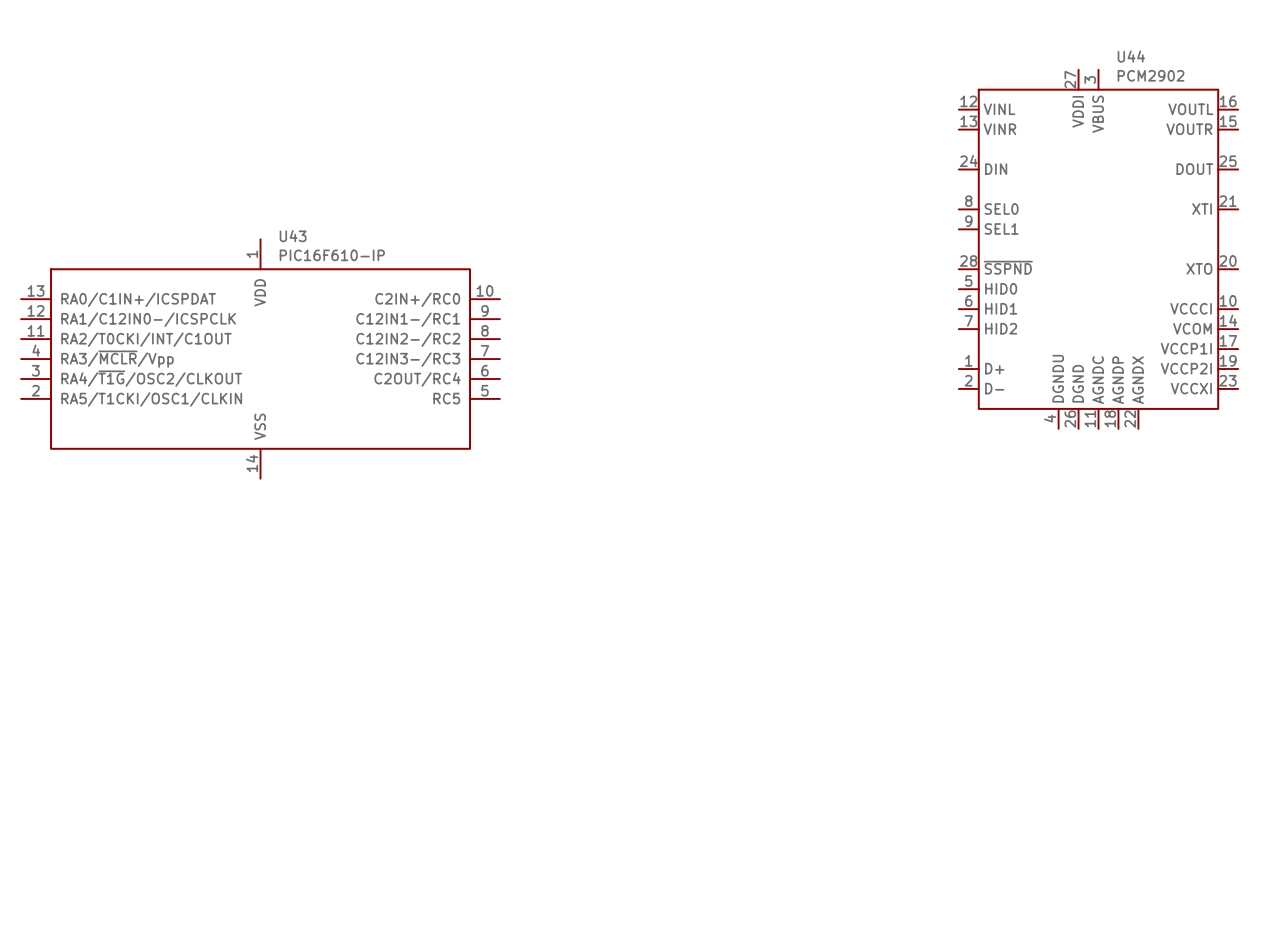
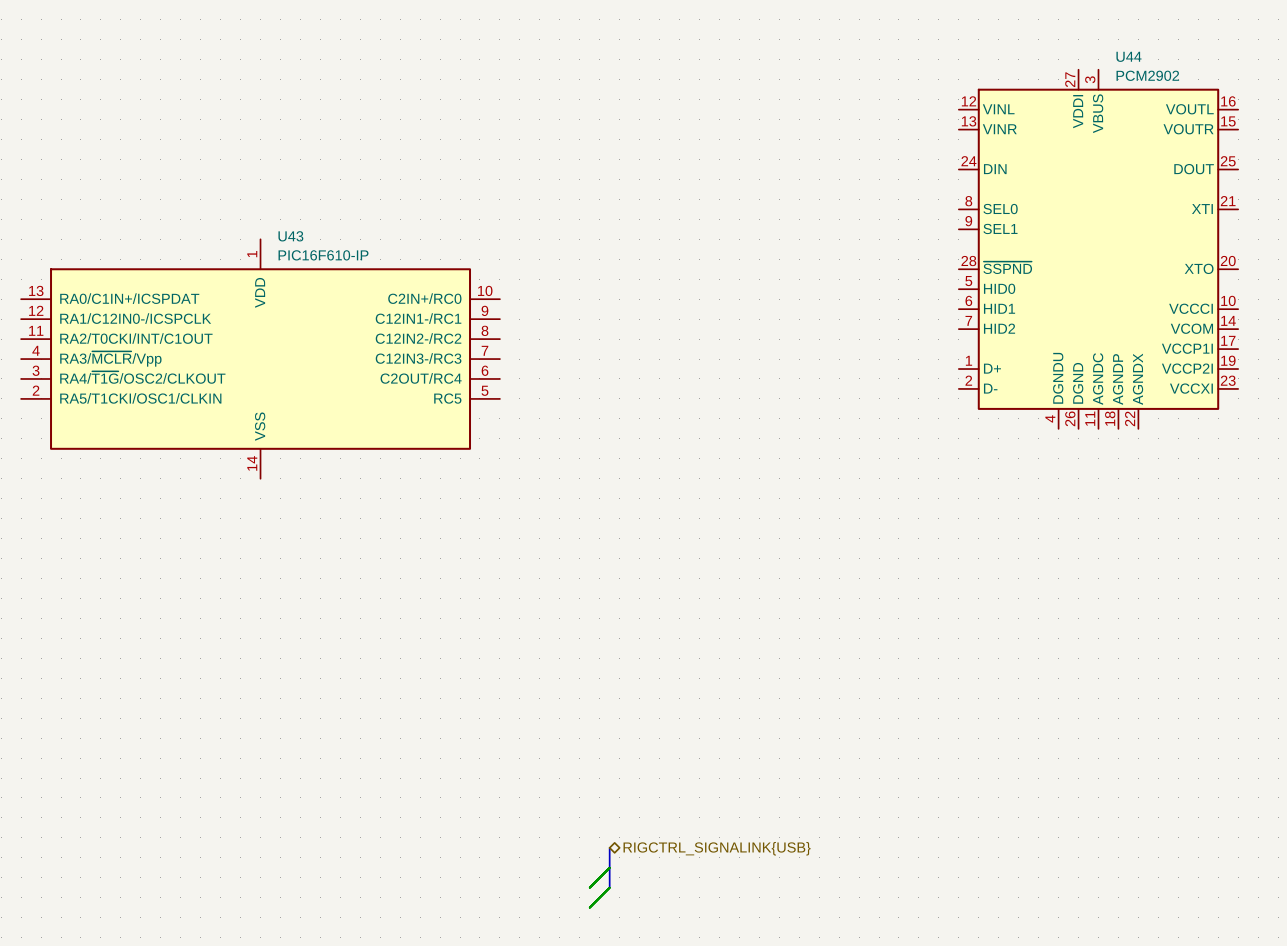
bus: none -> (609, 847) (609, 887)
hierarchical label: none -> RIGCTRL_SIGNALINK{USB} (717, 848)
wire: none -> (609, 867) (589, 887)
wire: none -> (609, 887) (589, 907)

